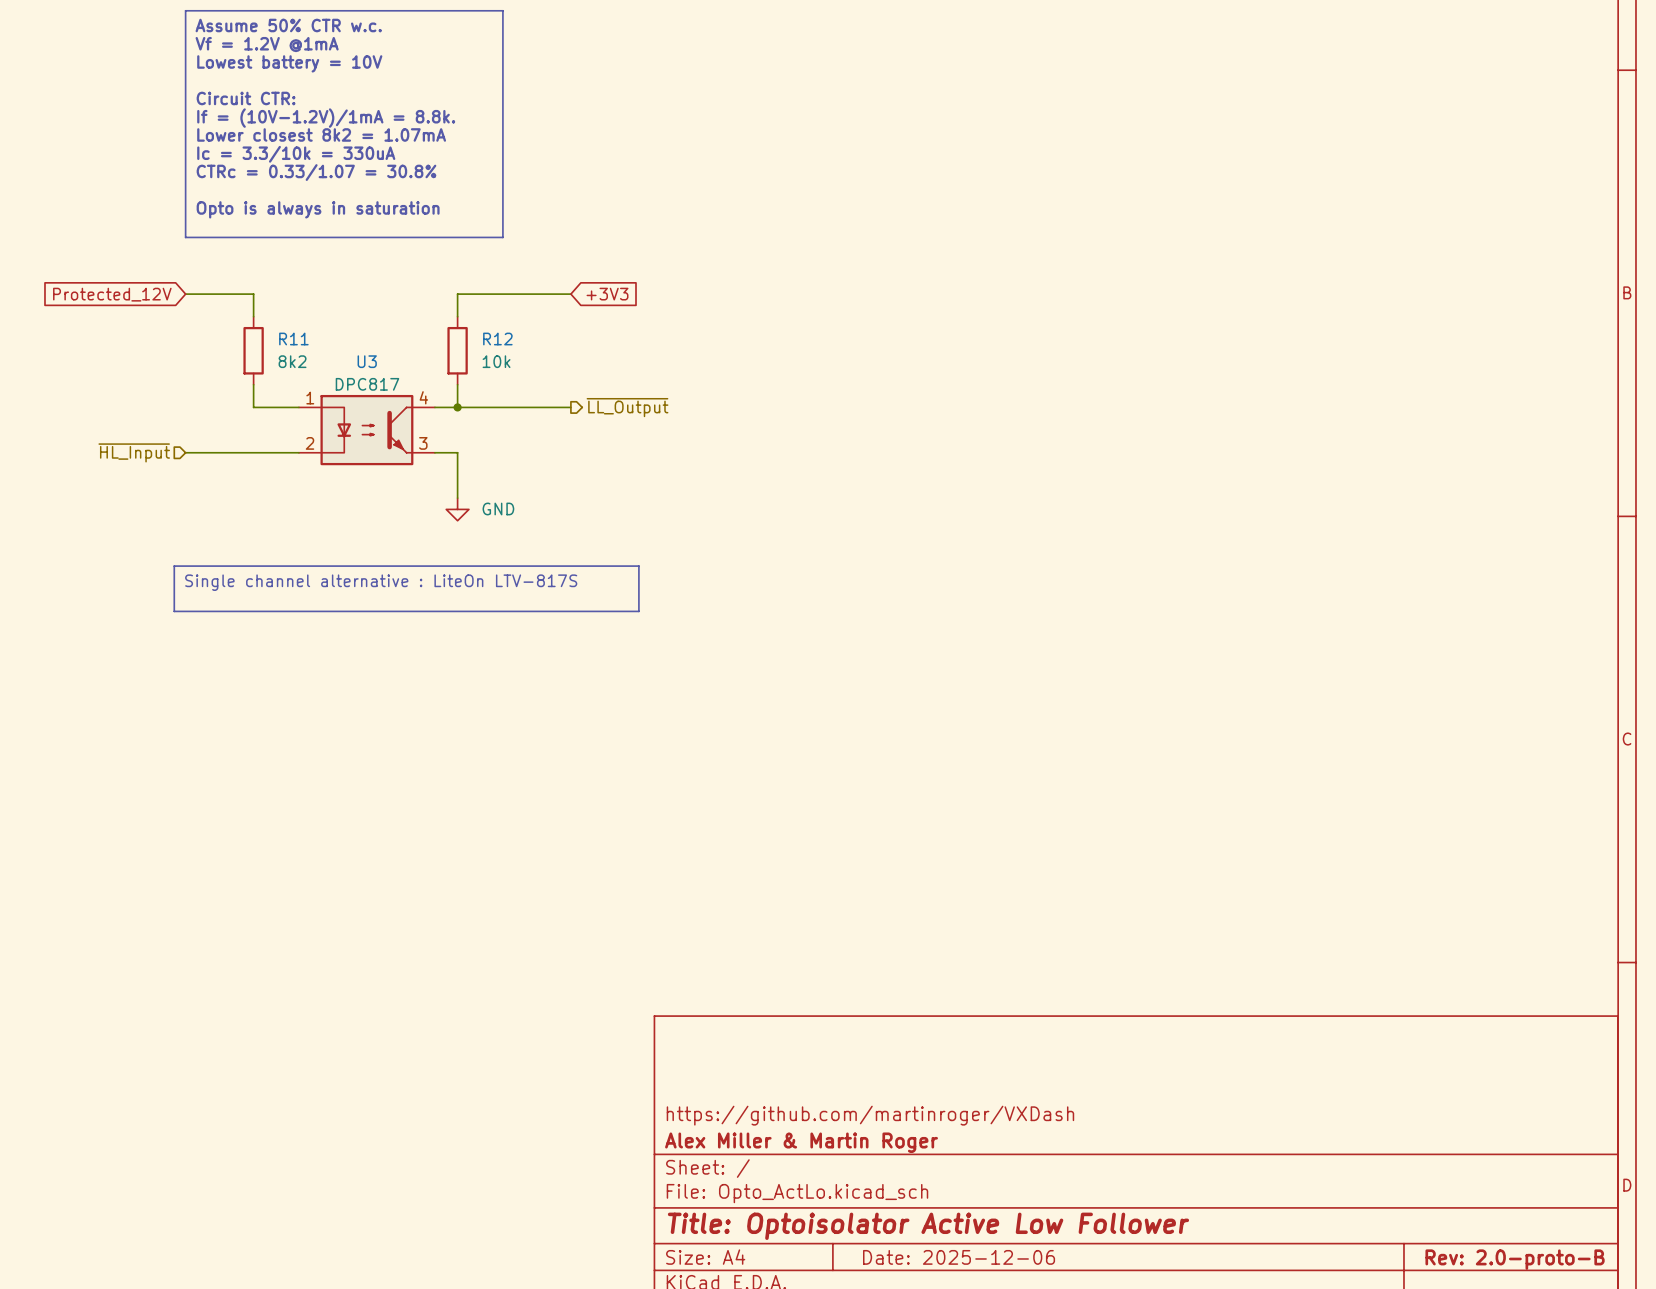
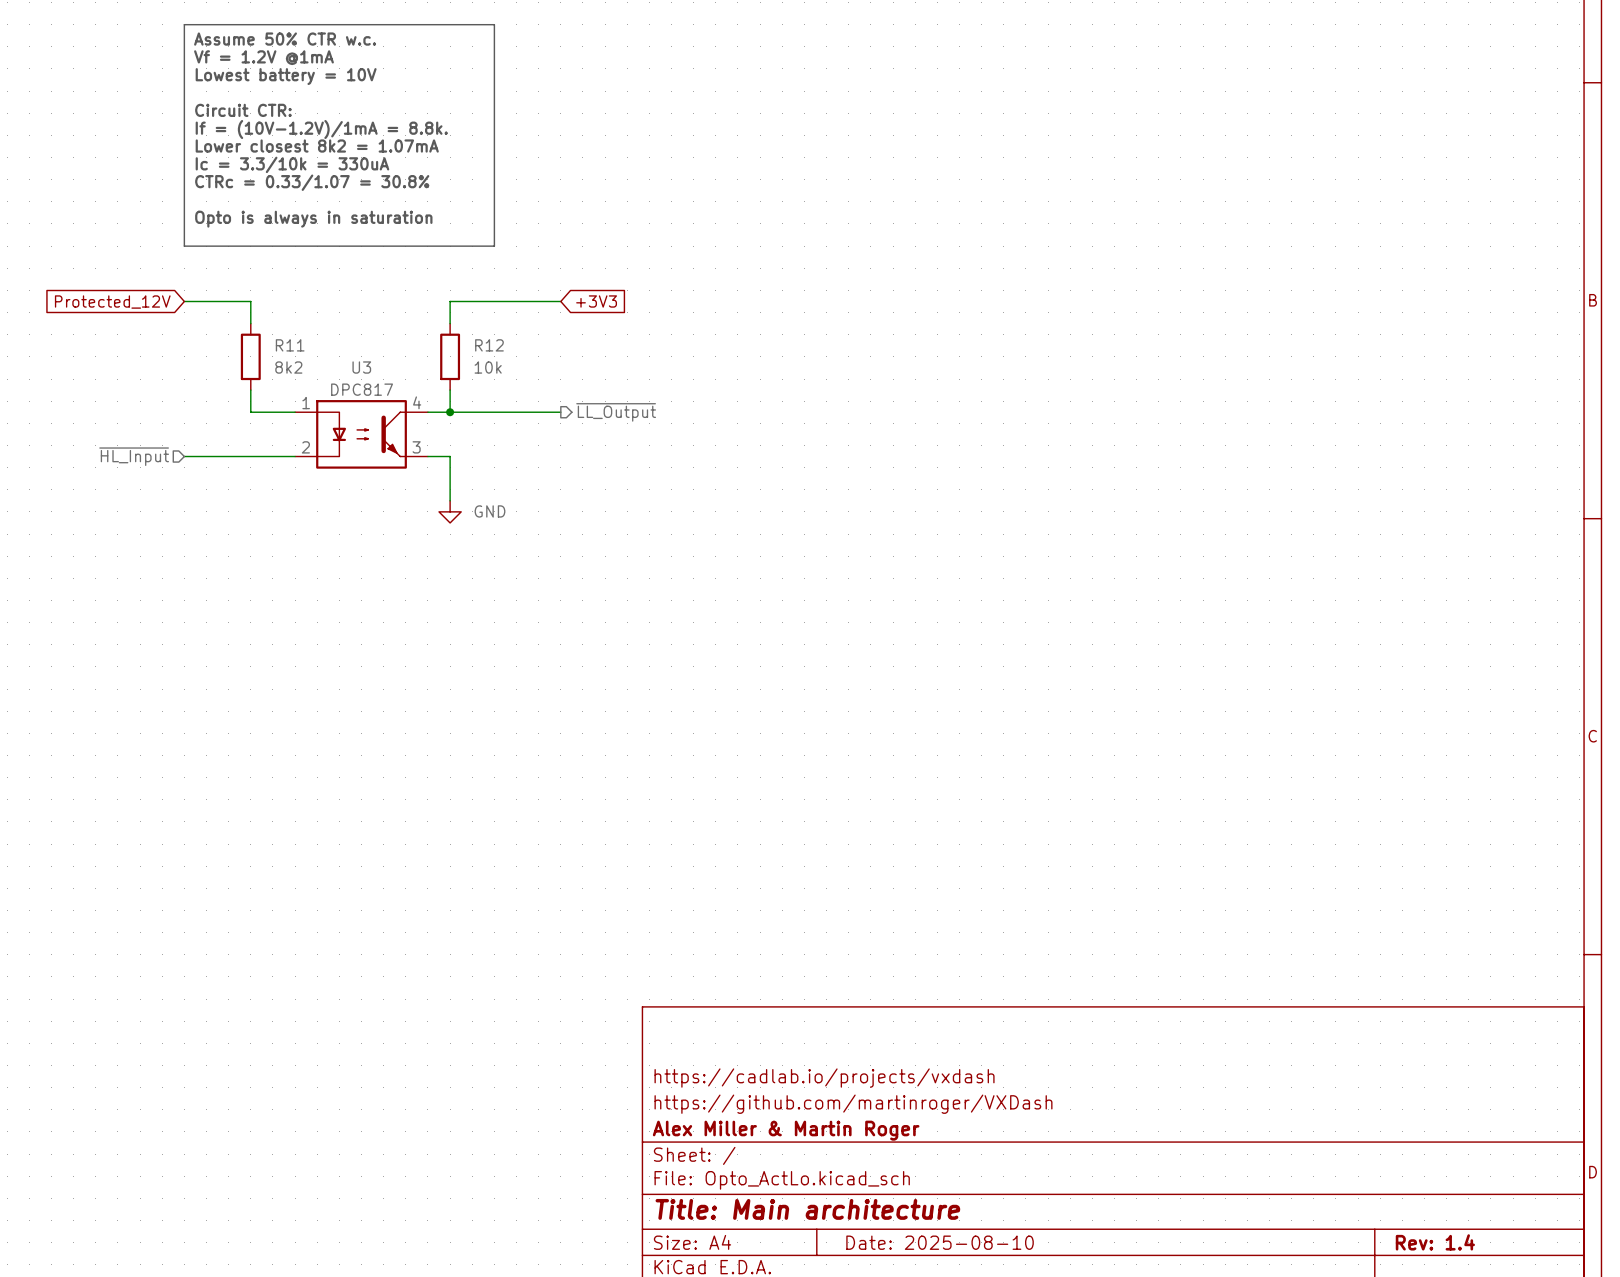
line: (174, 566) (638, 566) (638, 611) (174, 611) (174, 566) -> none
text: Single channel alternative : LiteOn LTV-817S (381, 582) -> none
title block: none -> https://cadlab.io/projects/vxdash (824, 1078)
title block: Title: Optoisolator Active Low Follower (928, 1226) -> Title: Main architecture (807, 1209)
title block: Date: 2025-12-06 (959, 1257) -> Date: 2025-08-10 (940, 1242)
title block: Rev: 2.0-proto-B (1515, 1259) -> Rev: 1.4 (1435, 1242)

